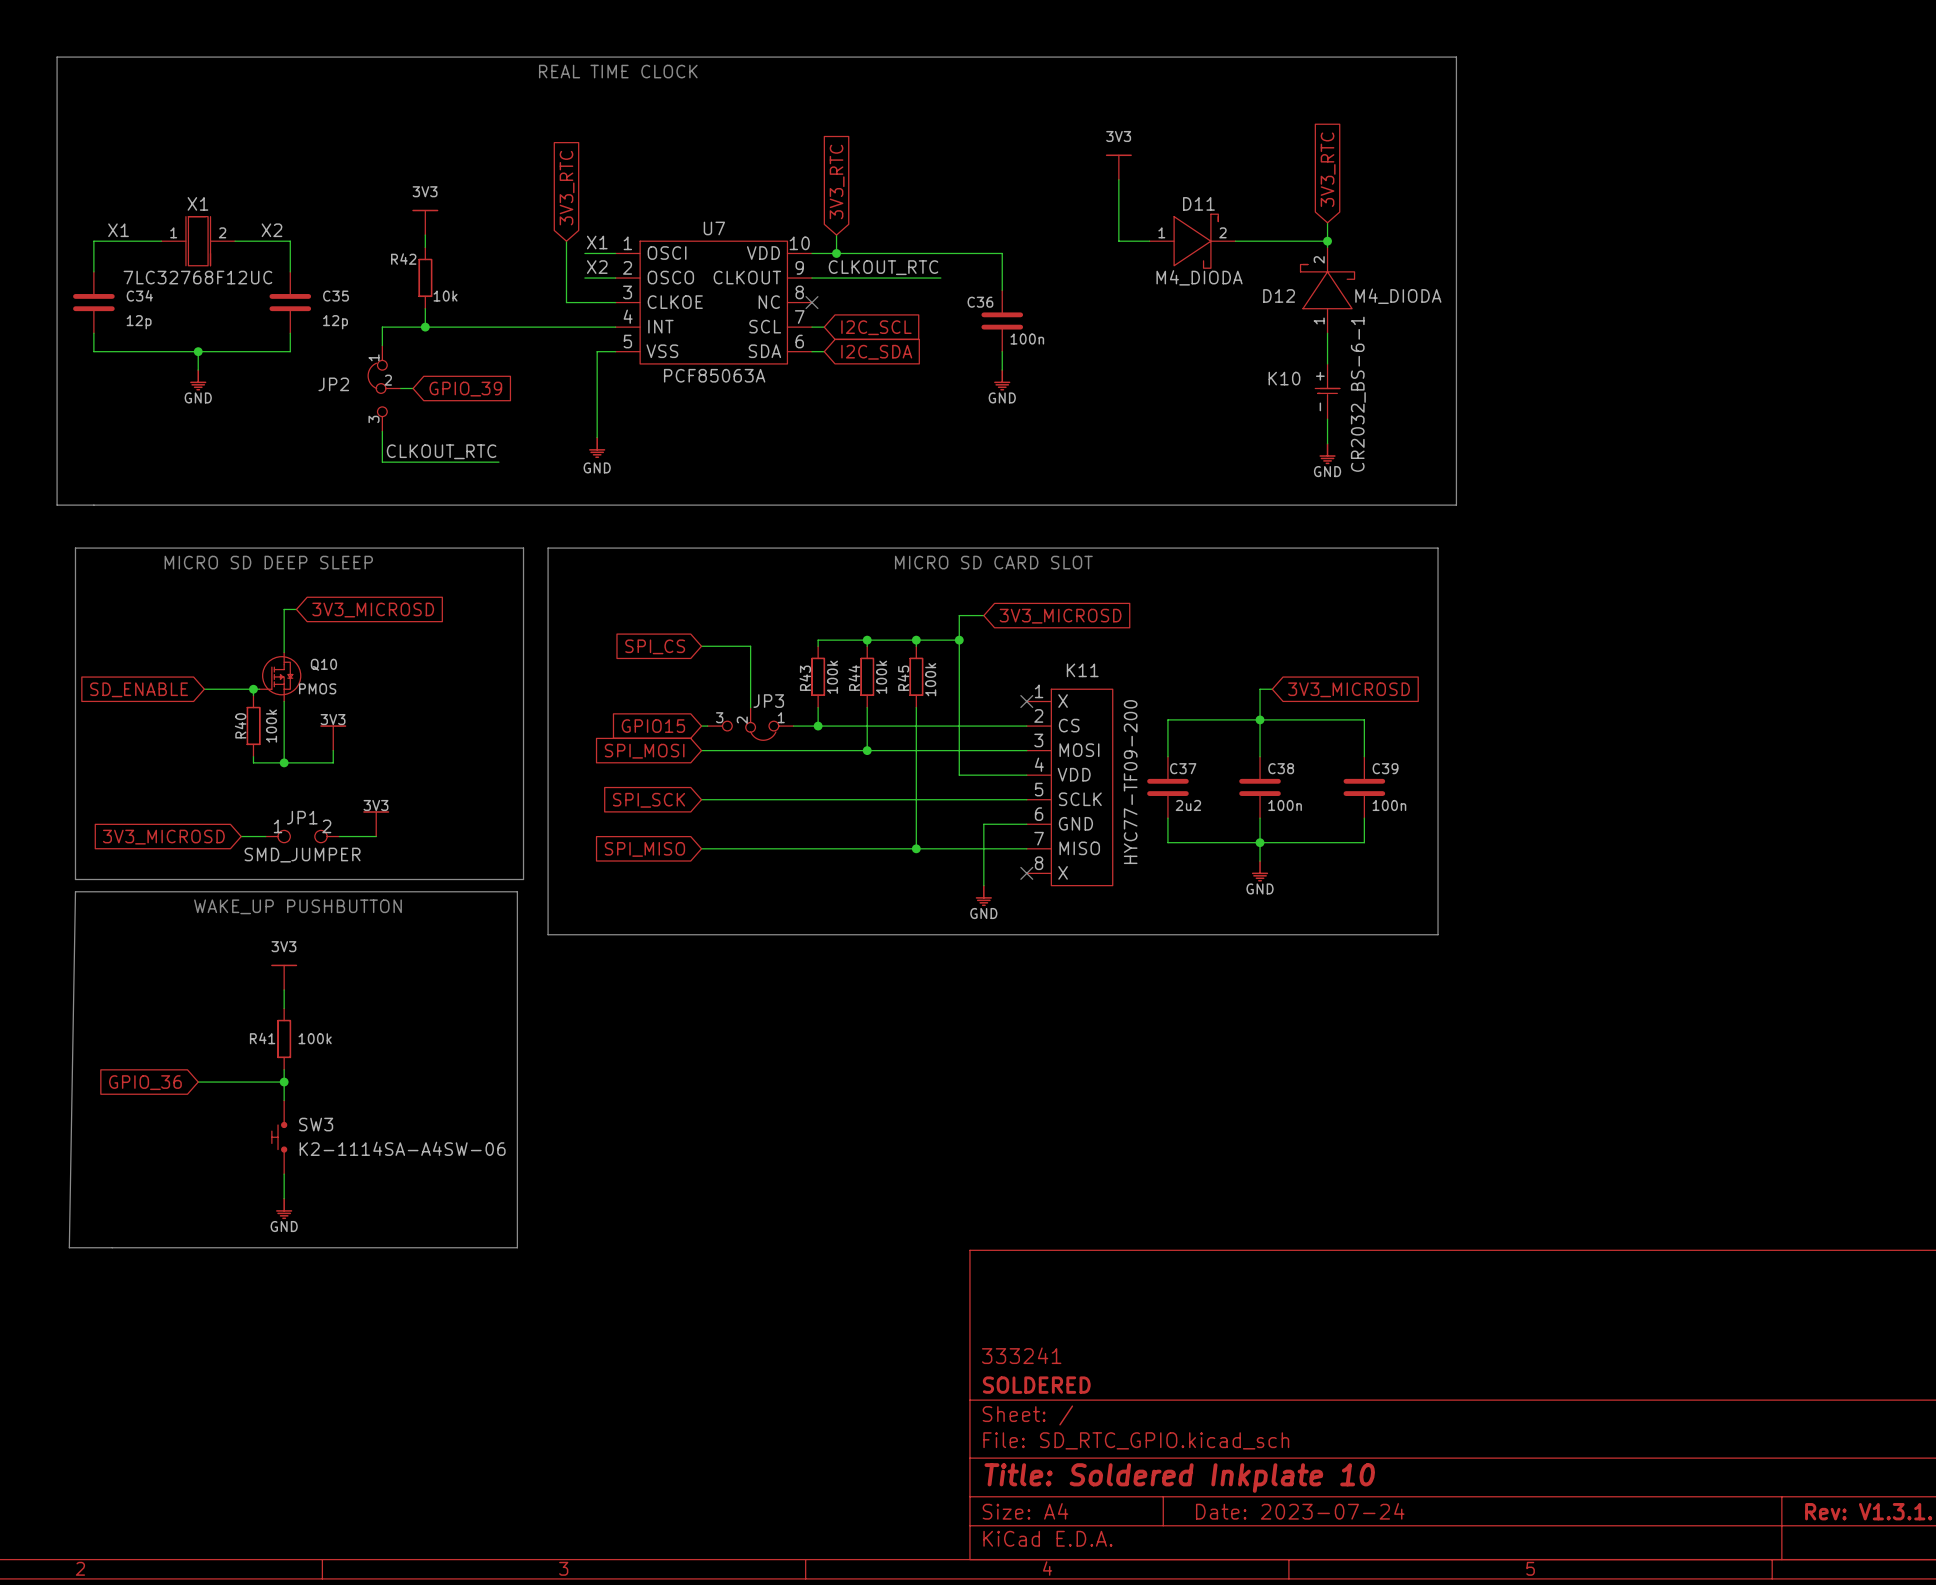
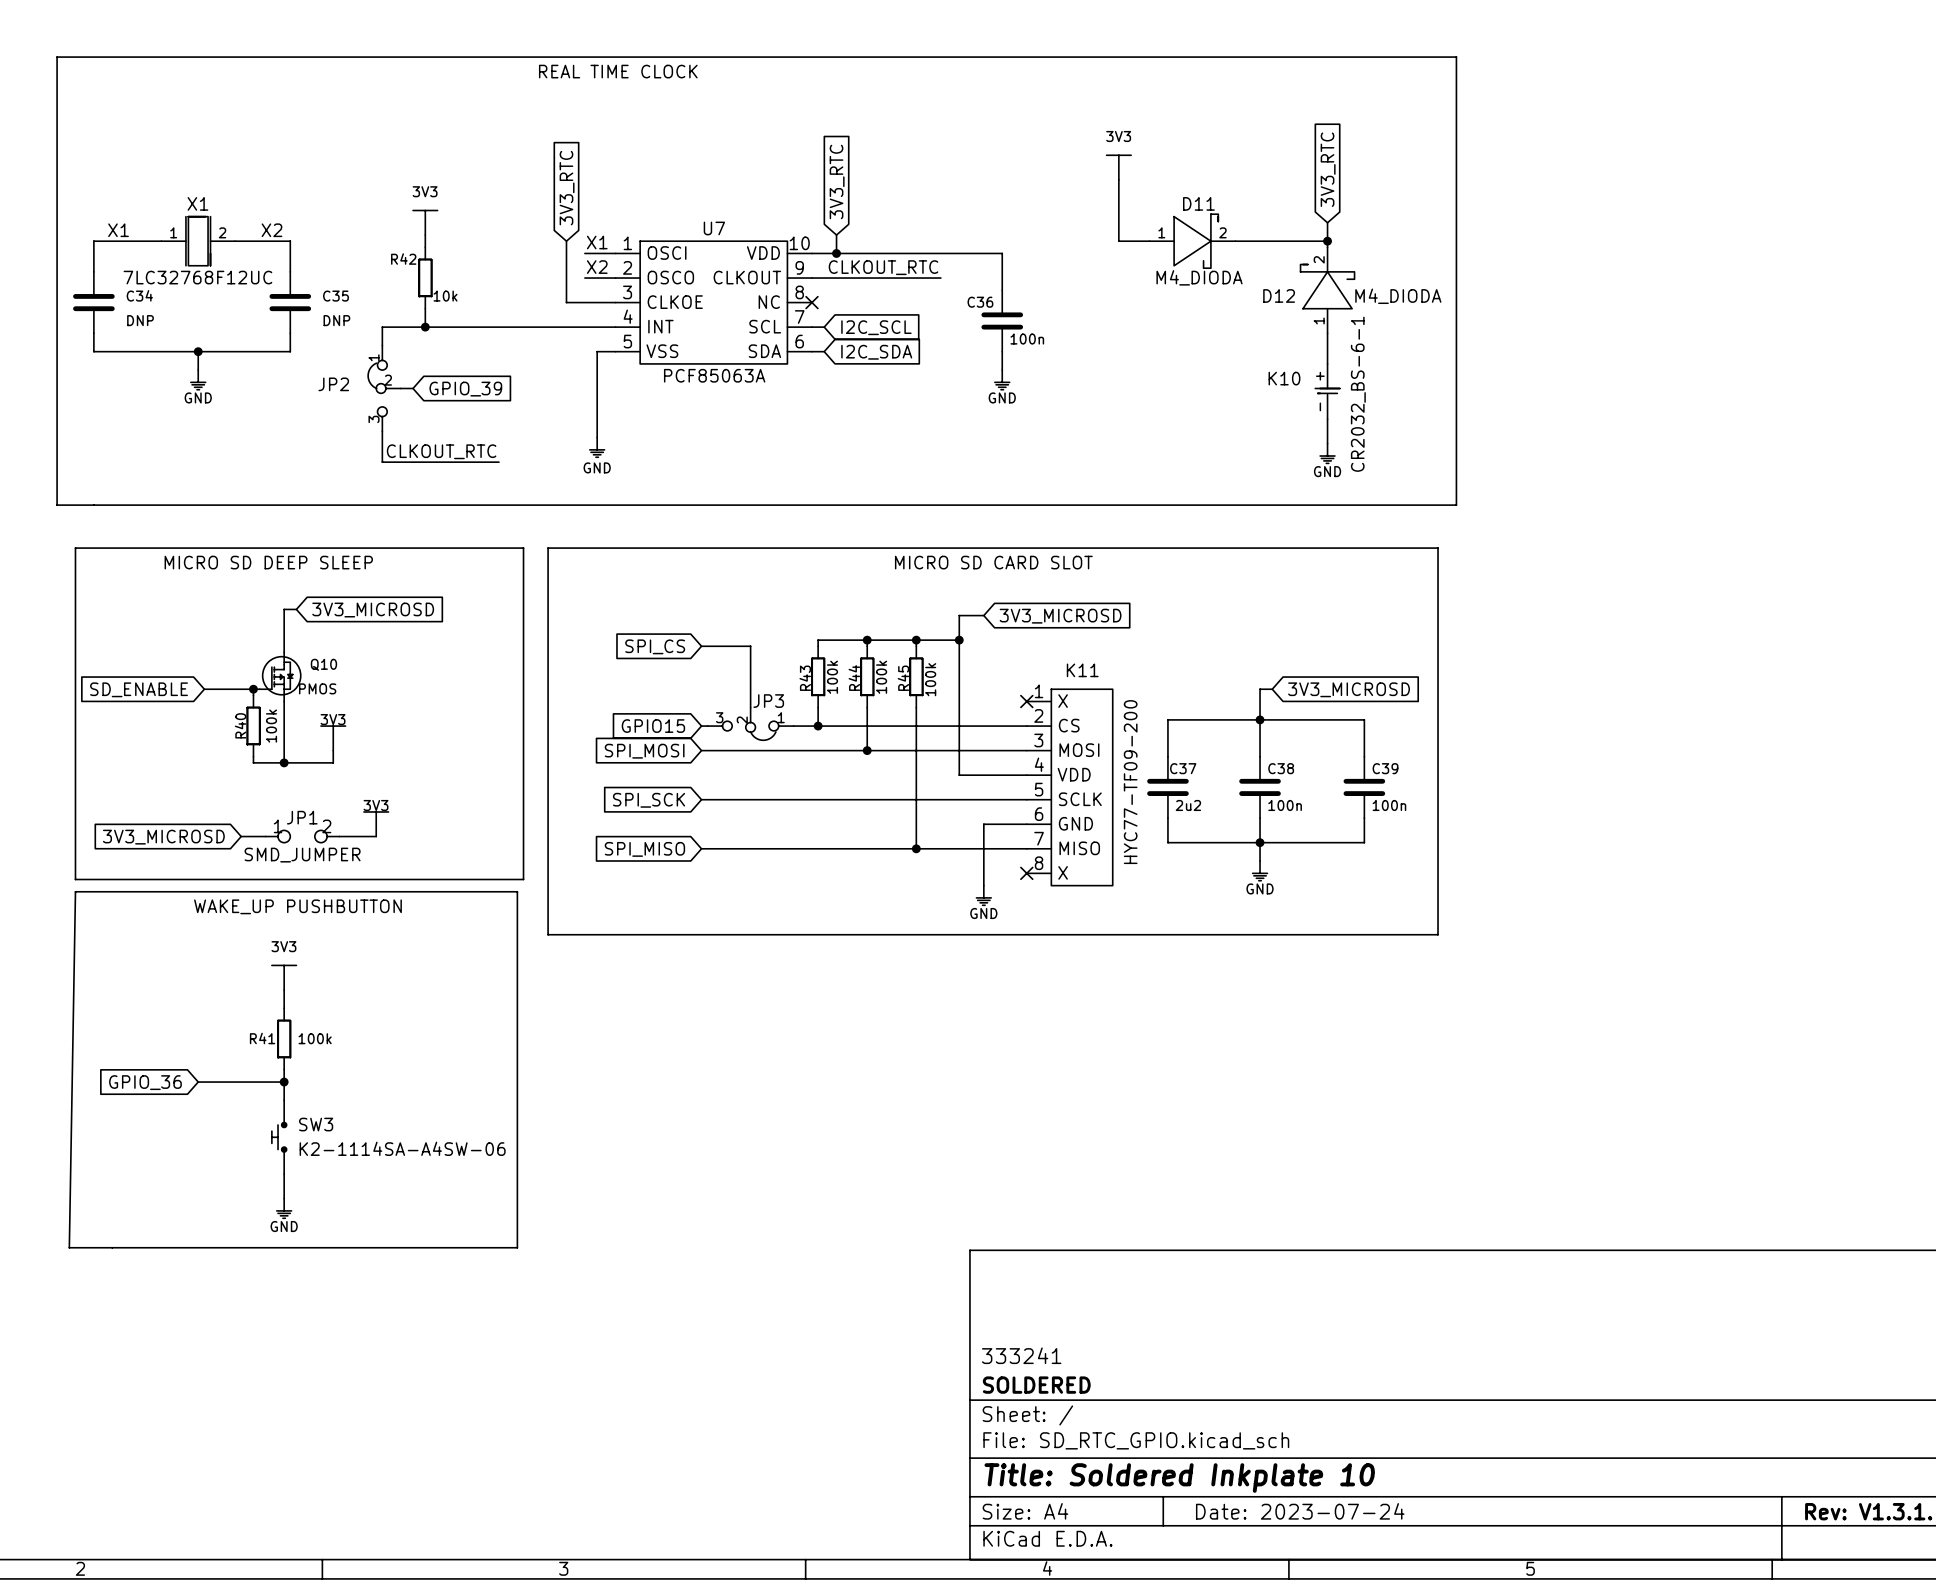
C34 value: 12p (139, 322) -> DNP (140, 320)
C35 value: 12p (335, 322) -> DNP (336, 320)

